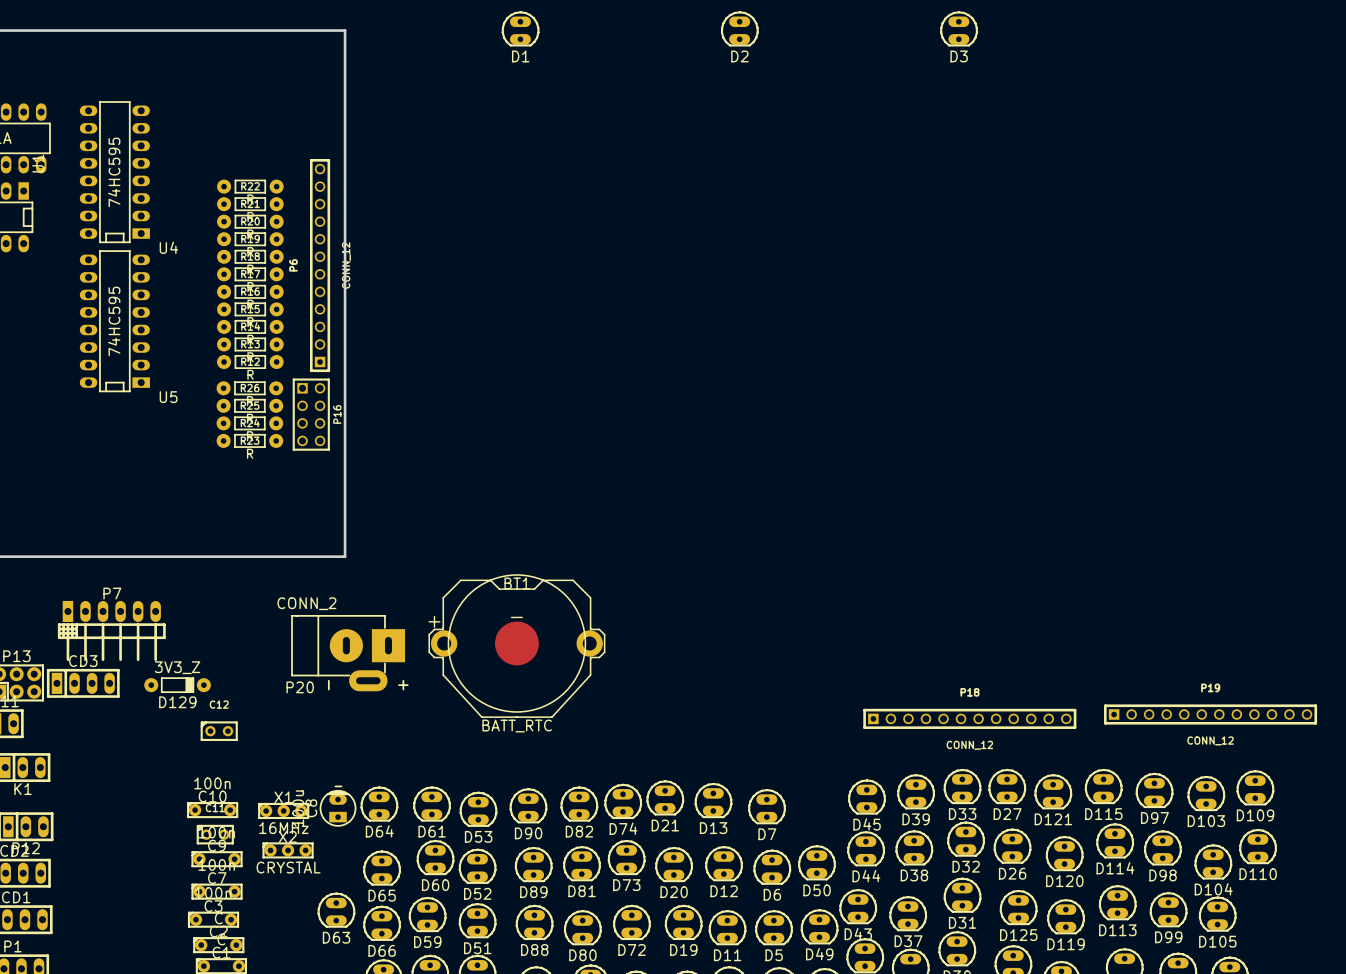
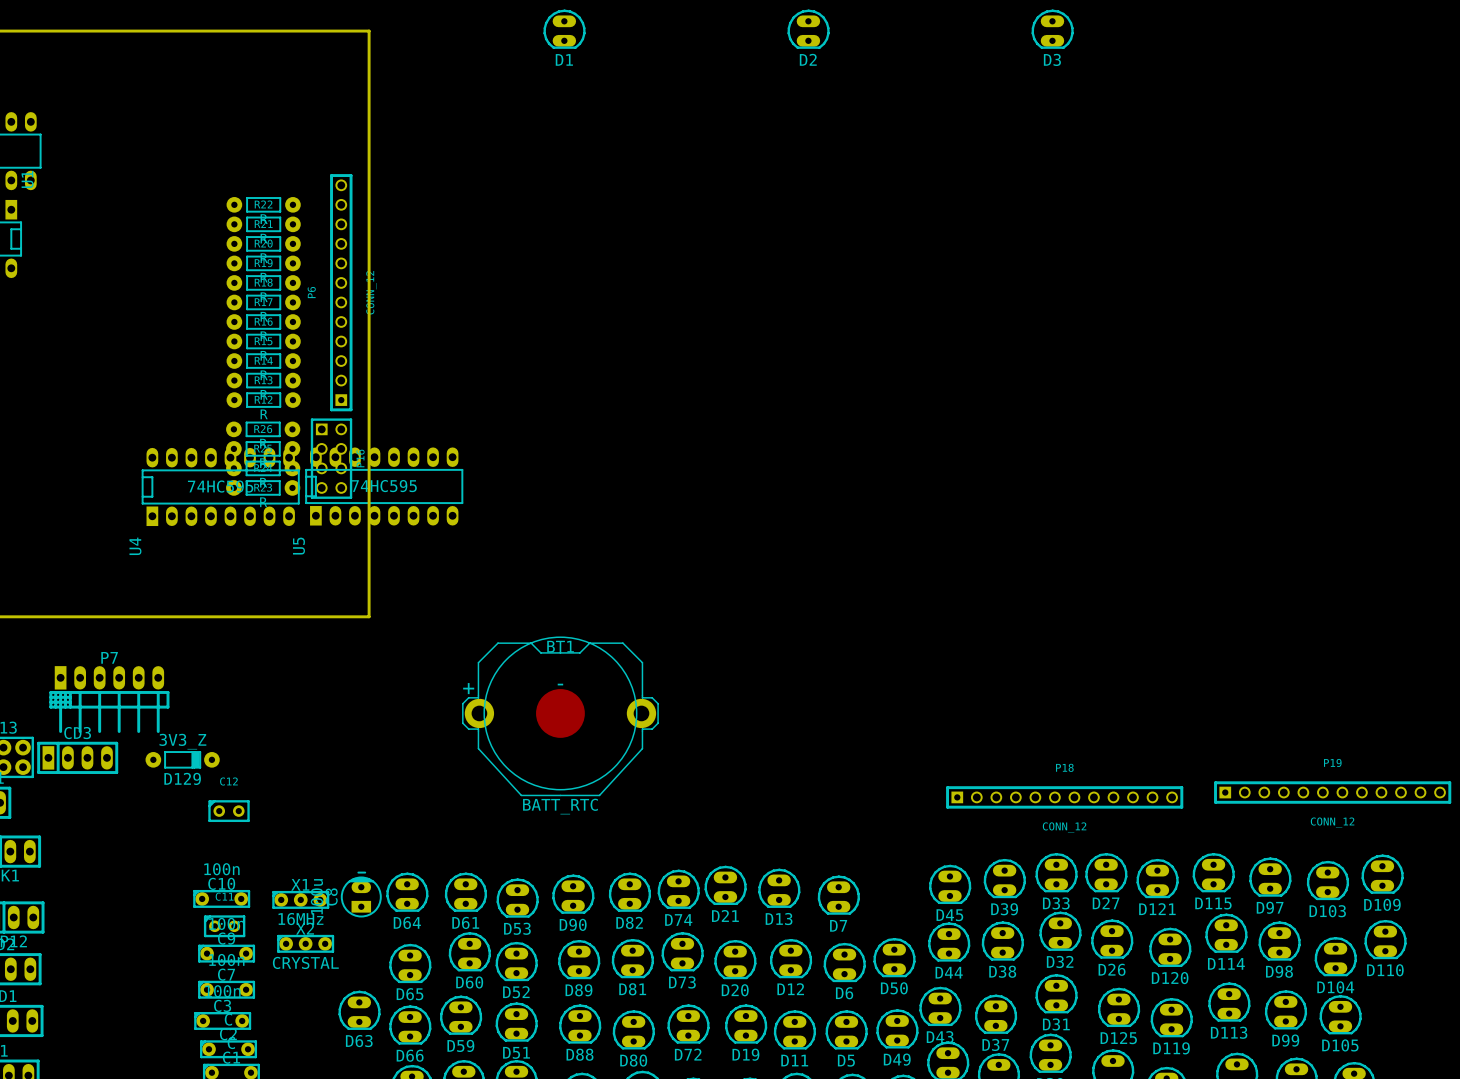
U4 rotation: 0° (114, 172) -> 90° clockwise (220, 486)
U4 position: (114, 172) -> (220, 486)
U5 rotation: 0° (114, 321) -> 90° clockwise (384, 486)
U5 position: (114, 321) -> (384, 486)
P20: CONN_2 (349, 653) -> none

